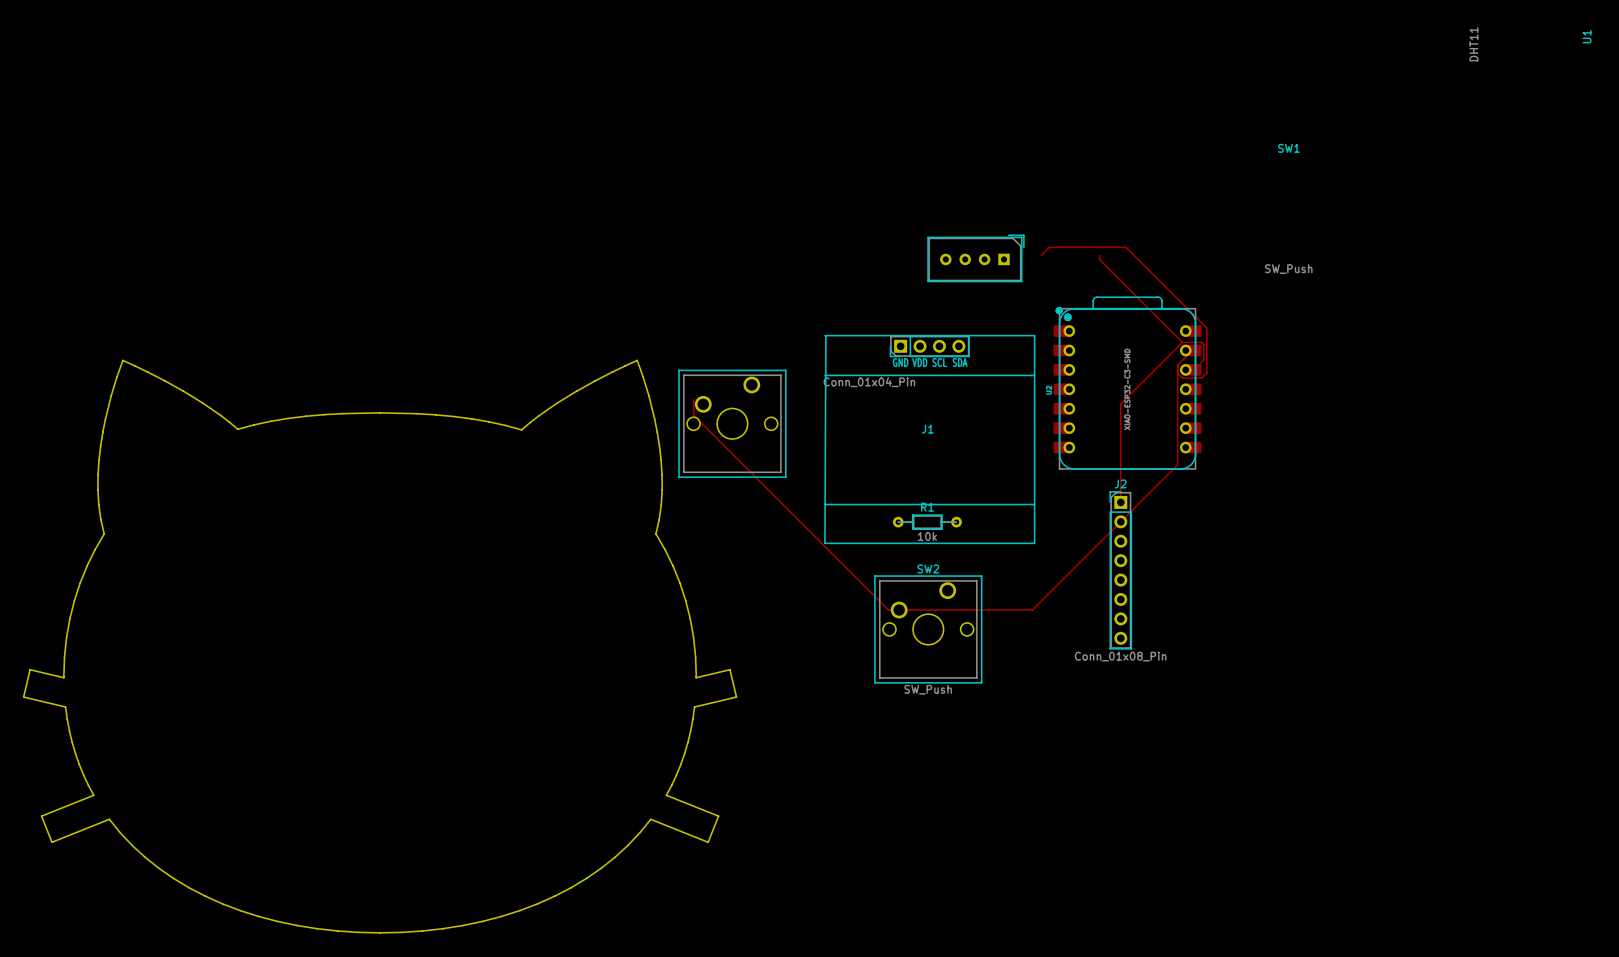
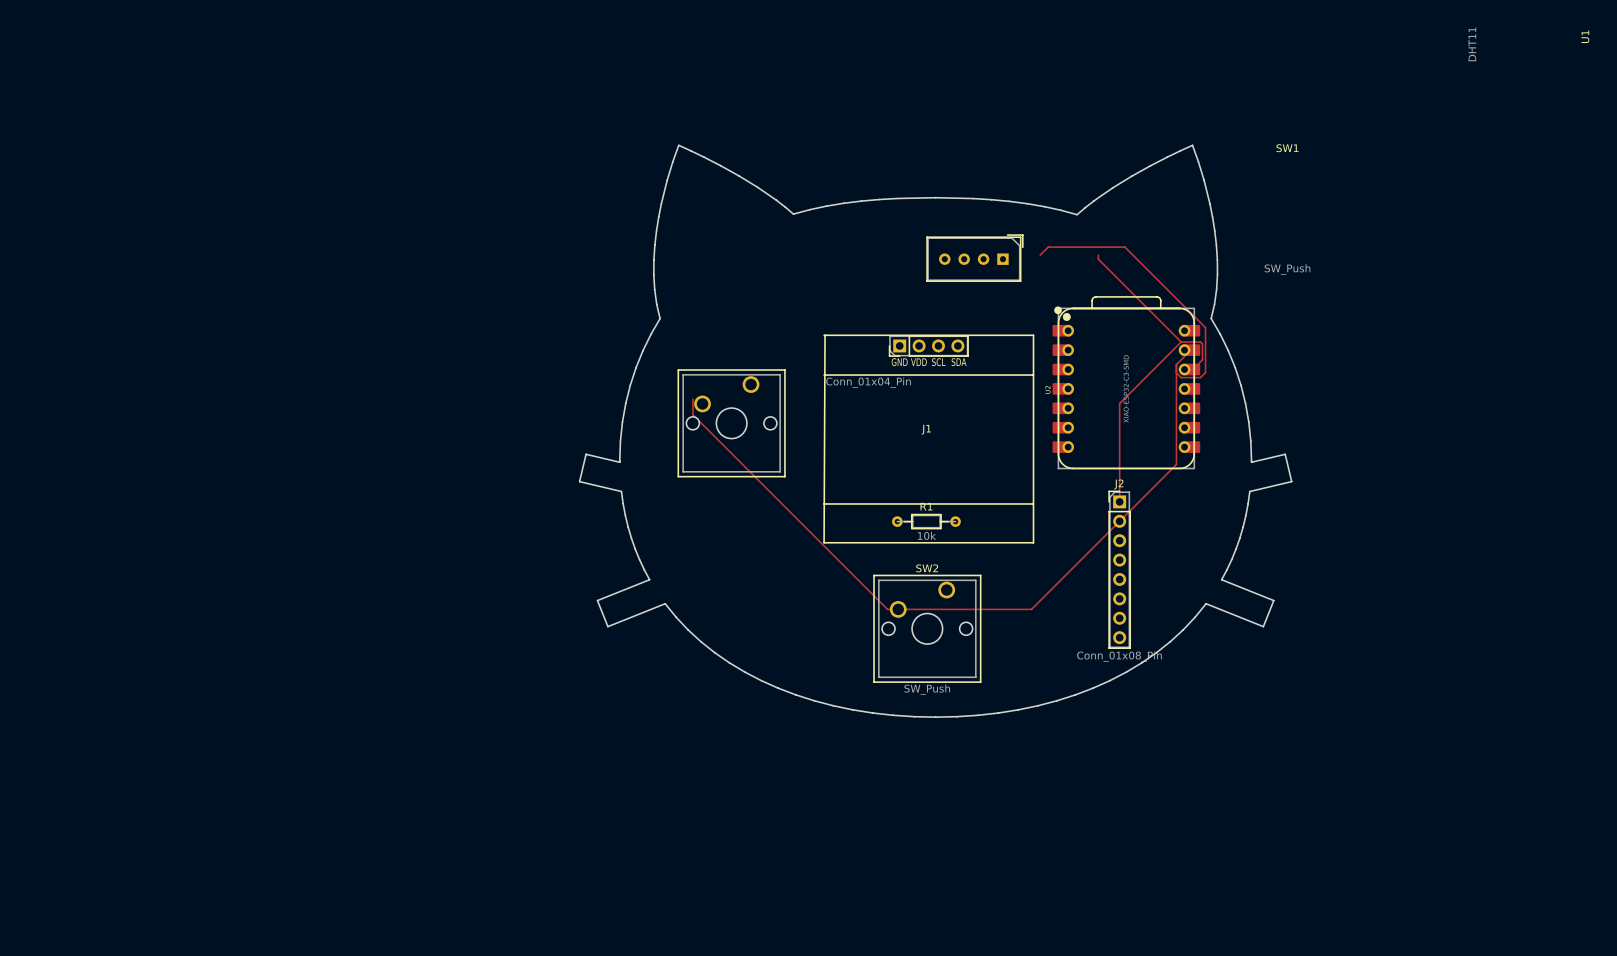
board edge: none -> (678, 145) (661, 203) (654, 245) (654, 289) (660, 318) (642, 350) (630, 385) (622, 422) (619, 462) (586, 454) (579, 481) (621, 491) (631, 538) (649, 579) (597, 600) (607, 626) (665, 603) (688, 629) (714, 652) (744, 672) (778, 688) (814, 700) (852, 709) (893, 715) (935, 717) (977, 715) (1018, 709) (1057, 700) (1093, 688) (1126, 672) (1156, 652) (1183, 629) (1206, 603) (1263, 626) (1273, 600) (1221, 579) (1239, 538) (1249, 491) (1291, 481) (1285, 454) (1251, 462) (1248, 422) (1240, 385) (1228, 350) (1211, 318) (1216, 289) (1216, 245) (1209, 203) (1192, 145) (1132, 176) (1094, 200) (1077, 214) (1044, 206) (1009, 201) (935, 197) (861, 201) (826, 206) (793, 214) (776, 200) (738, 175) (678, 145)
board edge: (122, 360) (105, 419) (99, 460) (98, 504) (104, 533) (87, 566) (74, 600) (66, 637) (63, 677) (30, 669) (23, 697) (65, 707) (75, 753) (93, 795) (41, 816) (51, 842) (109, 819) (132, 845) (158, 868) (189, 887) (222, 903) (258, 916) (297, 925) (337, 931) (380, 932) (422, 931) (463, 925) (501, 916) (537, 903) (571, 887) (601, 868) (627, 845) (650, 819) (708, 842) (718, 816) (666, 795) (684, 753) (694, 707) (736, 697) (730, 669) (696, 677) (693, 637) (685, 600) (673, 566) (655, 533) (661, 504) (661, 460) (654, 418) (637, 360) (576, 391) (538, 415) (521, 429) (488, 421) (453, 416) (380, 412) (305, 416) (270, 421) (237, 429) (220, 415) (182, 390) (122, 360) -> none

